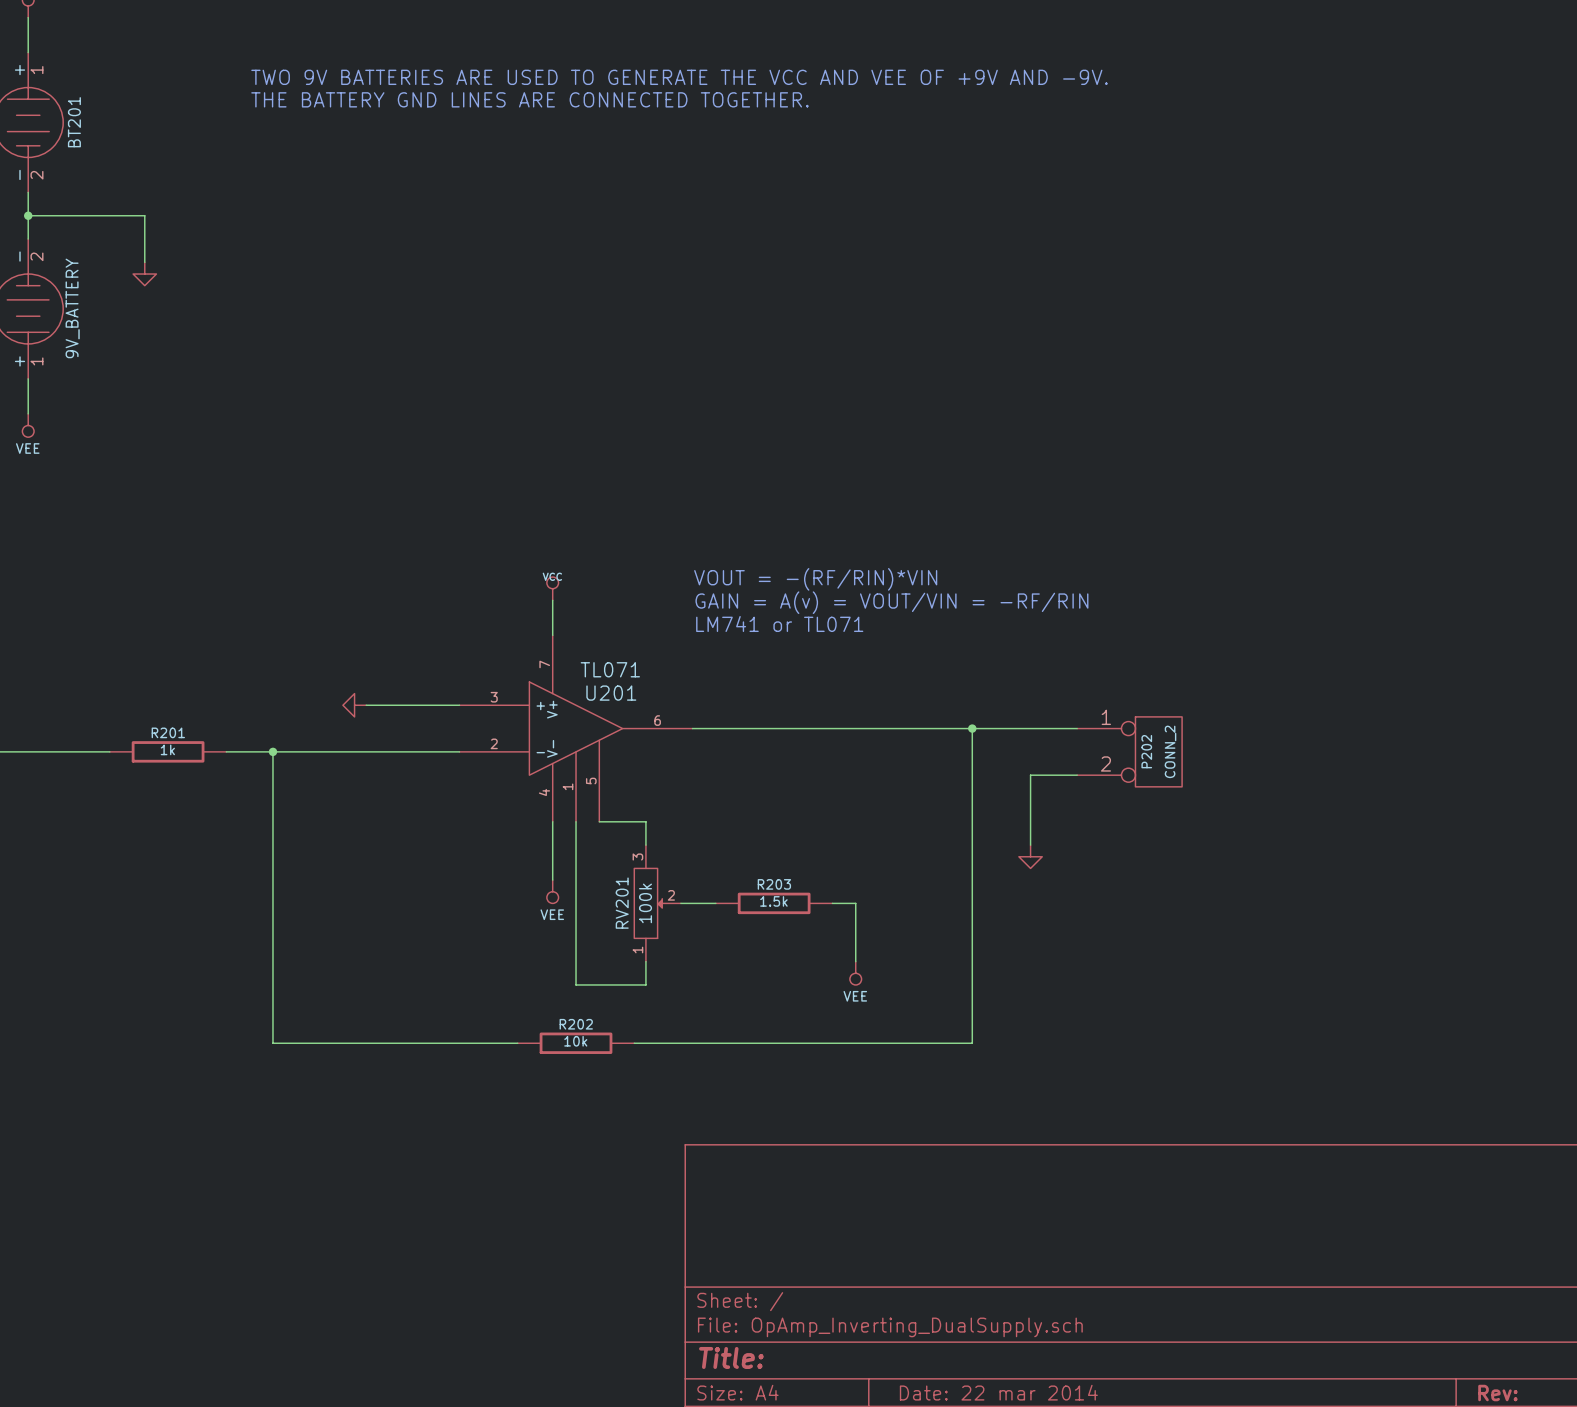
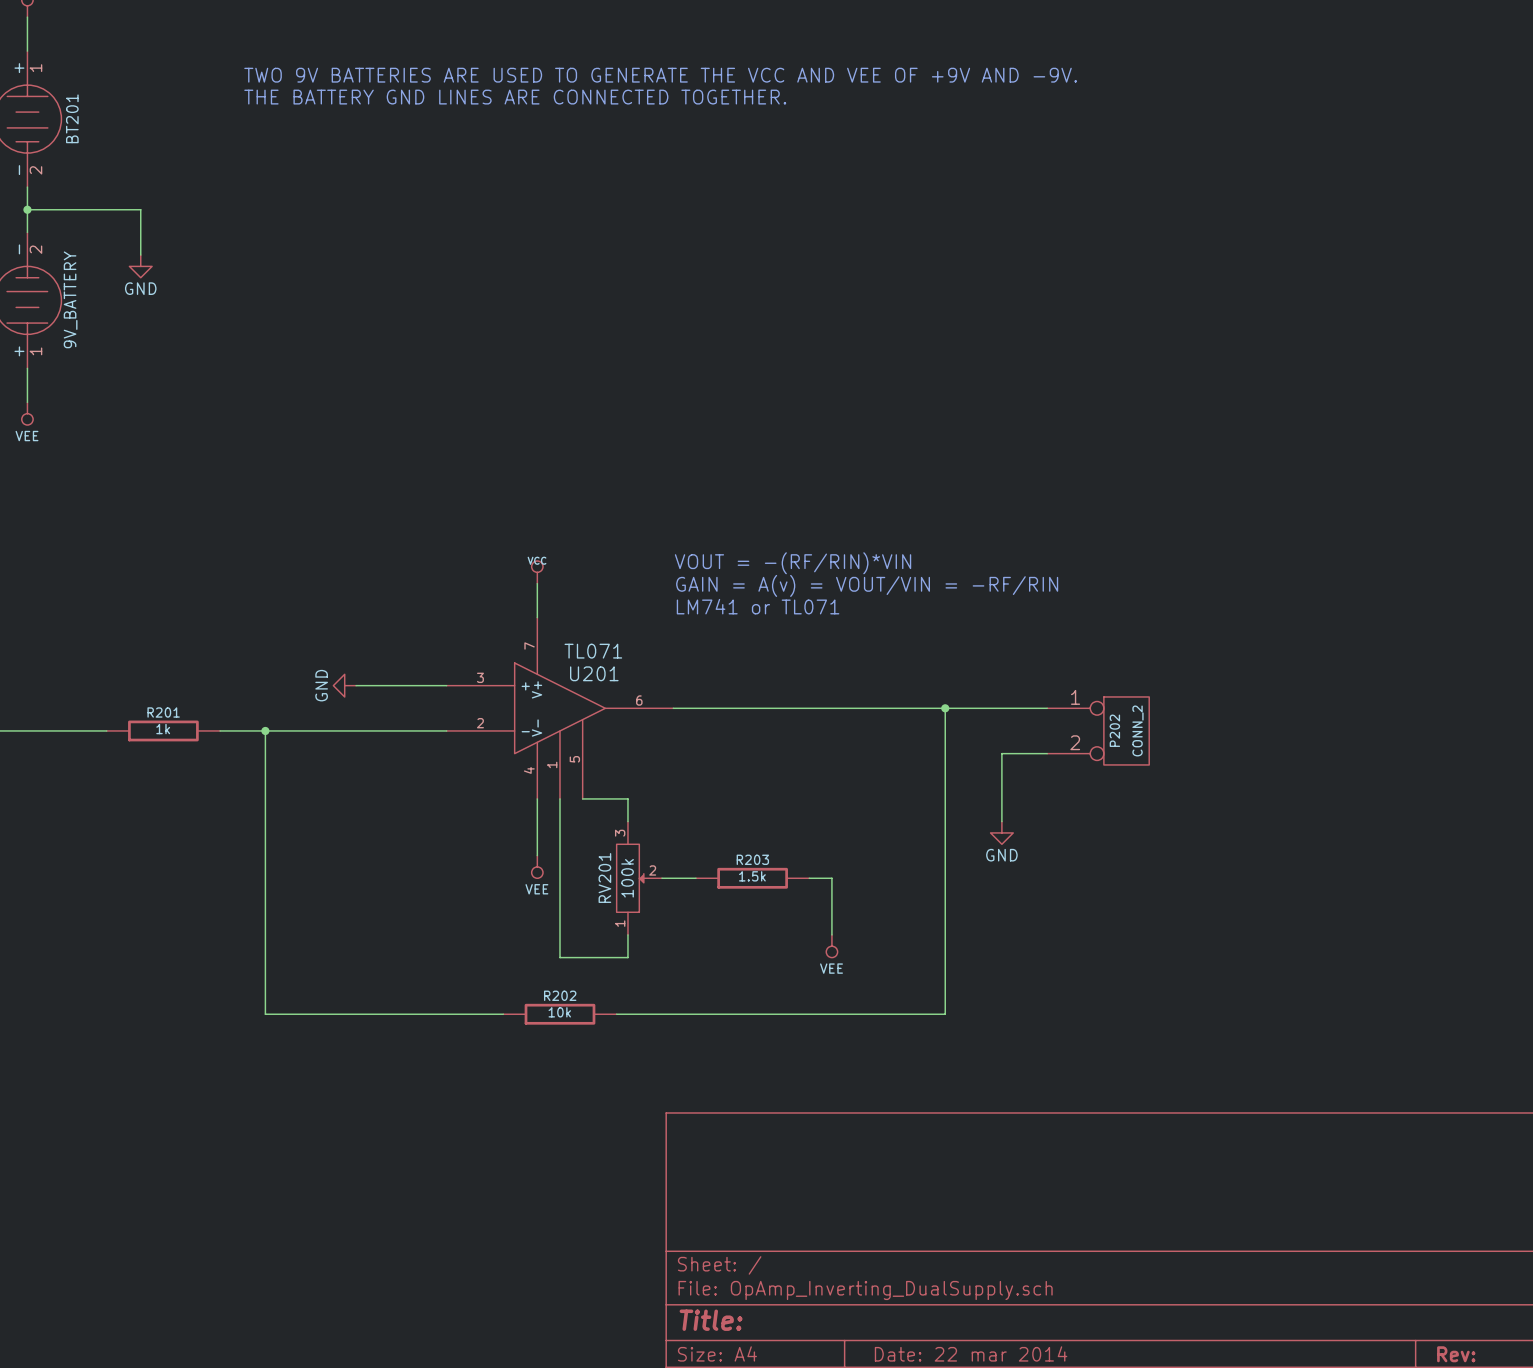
power symbol text: none -> GND (140, 288)
power symbol text: none -> GND (321, 685)
power symbol text: none -> GND (1001, 855)

